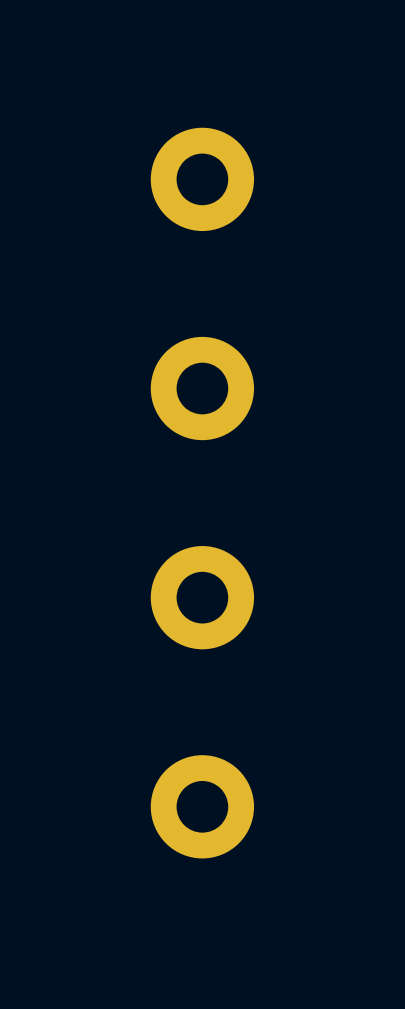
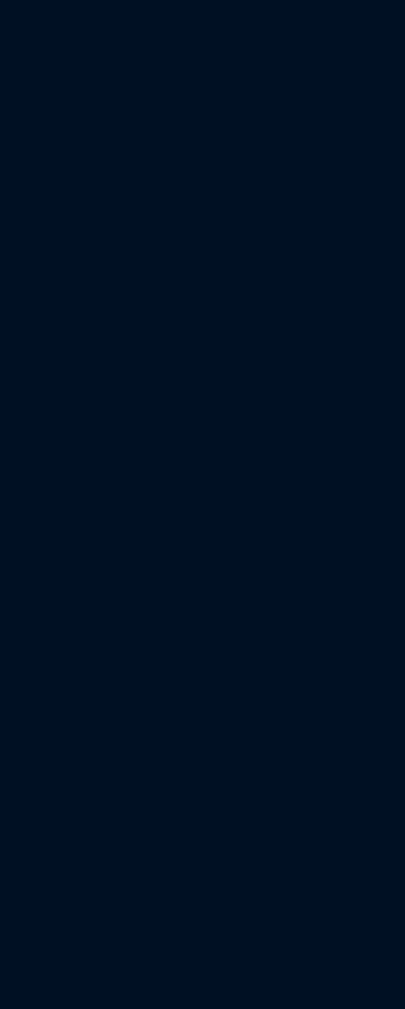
part: (202, 179) -> none
part: (202, 388) -> none
part: (202, 597) -> none
part: (202, 806) -> none

